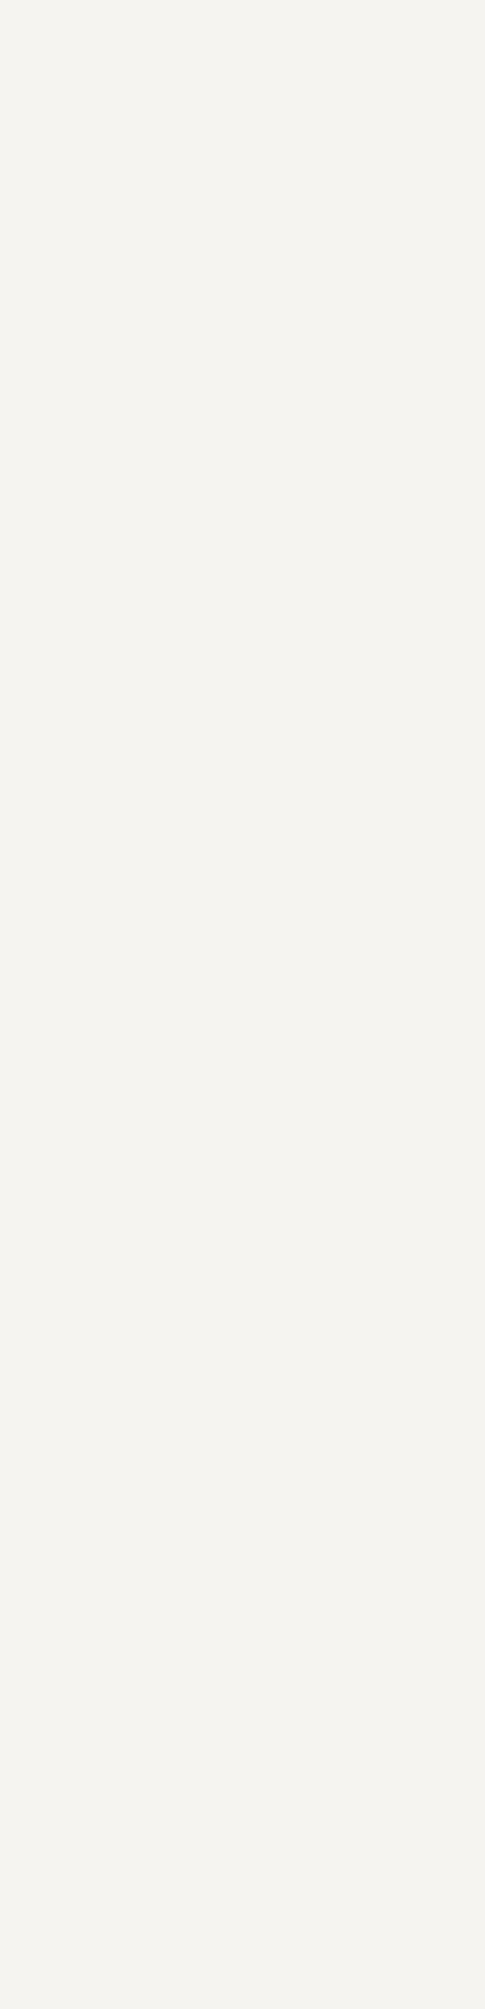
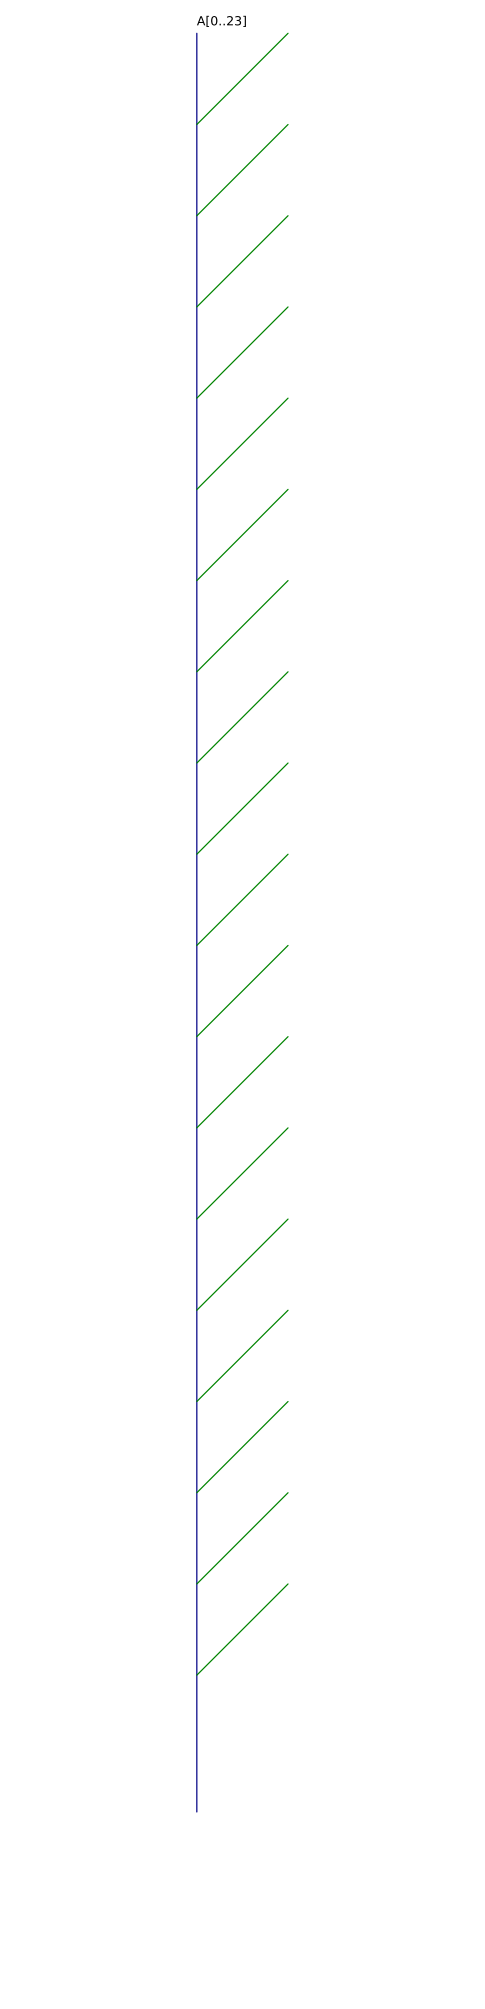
label: none -> A[0..23] (221, 21)
bus: none -> (196, 33) (196, 1811)
wire: none -> (288, 33) (196, 124)
wire: none -> (288, 124) (196, 215)
wire: none -> (288, 215) (196, 306)
wire: none -> (288, 306) (196, 398)
wire: none -> (288, 398) (196, 489)
wire: none -> (288, 489) (196, 580)
wire: none -> (288, 580) (196, 671)
wire: none -> (288, 671) (196, 763)
wire: none -> (288, 763) (196, 854)
wire: none -> (288, 854) (196, 945)
wire: none -> (288, 945) (196, 1036)
wire: none -> (288, 1036) (196, 1127)
wire: none -> (288, 1127) (196, 1219)
wire: none -> (288, 1219) (196, 1310)
wire: none -> (288, 1310) (196, 1401)
wire: none -> (288, 1401) (196, 1492)
wire: none -> (288, 1492) (196, 1583)
wire: none -> (288, 1583) (196, 1675)

